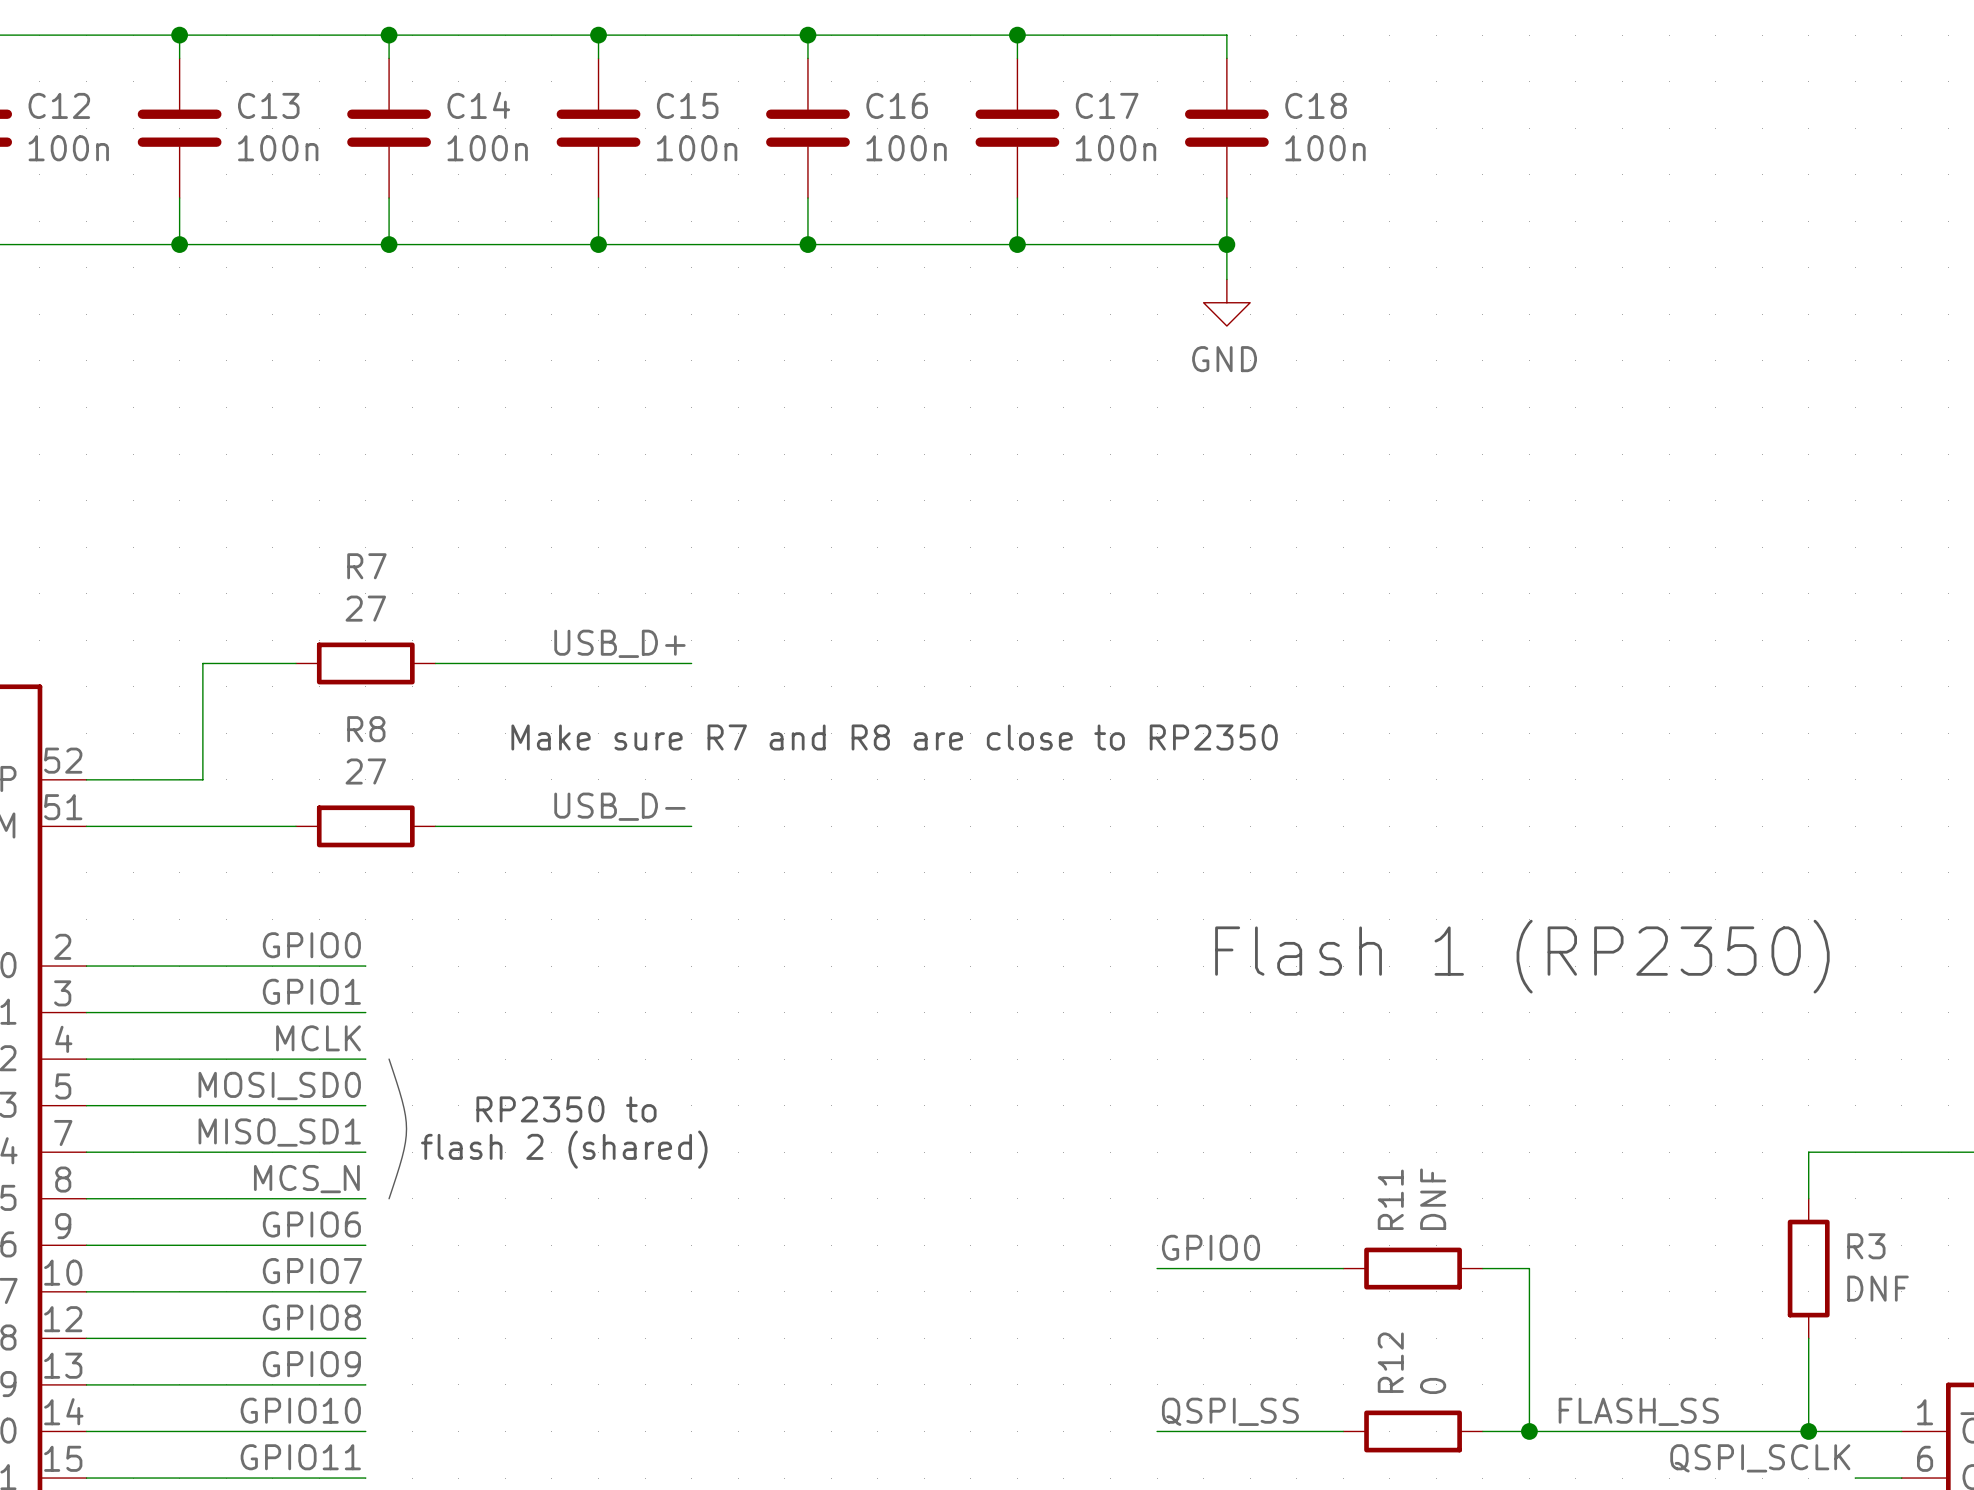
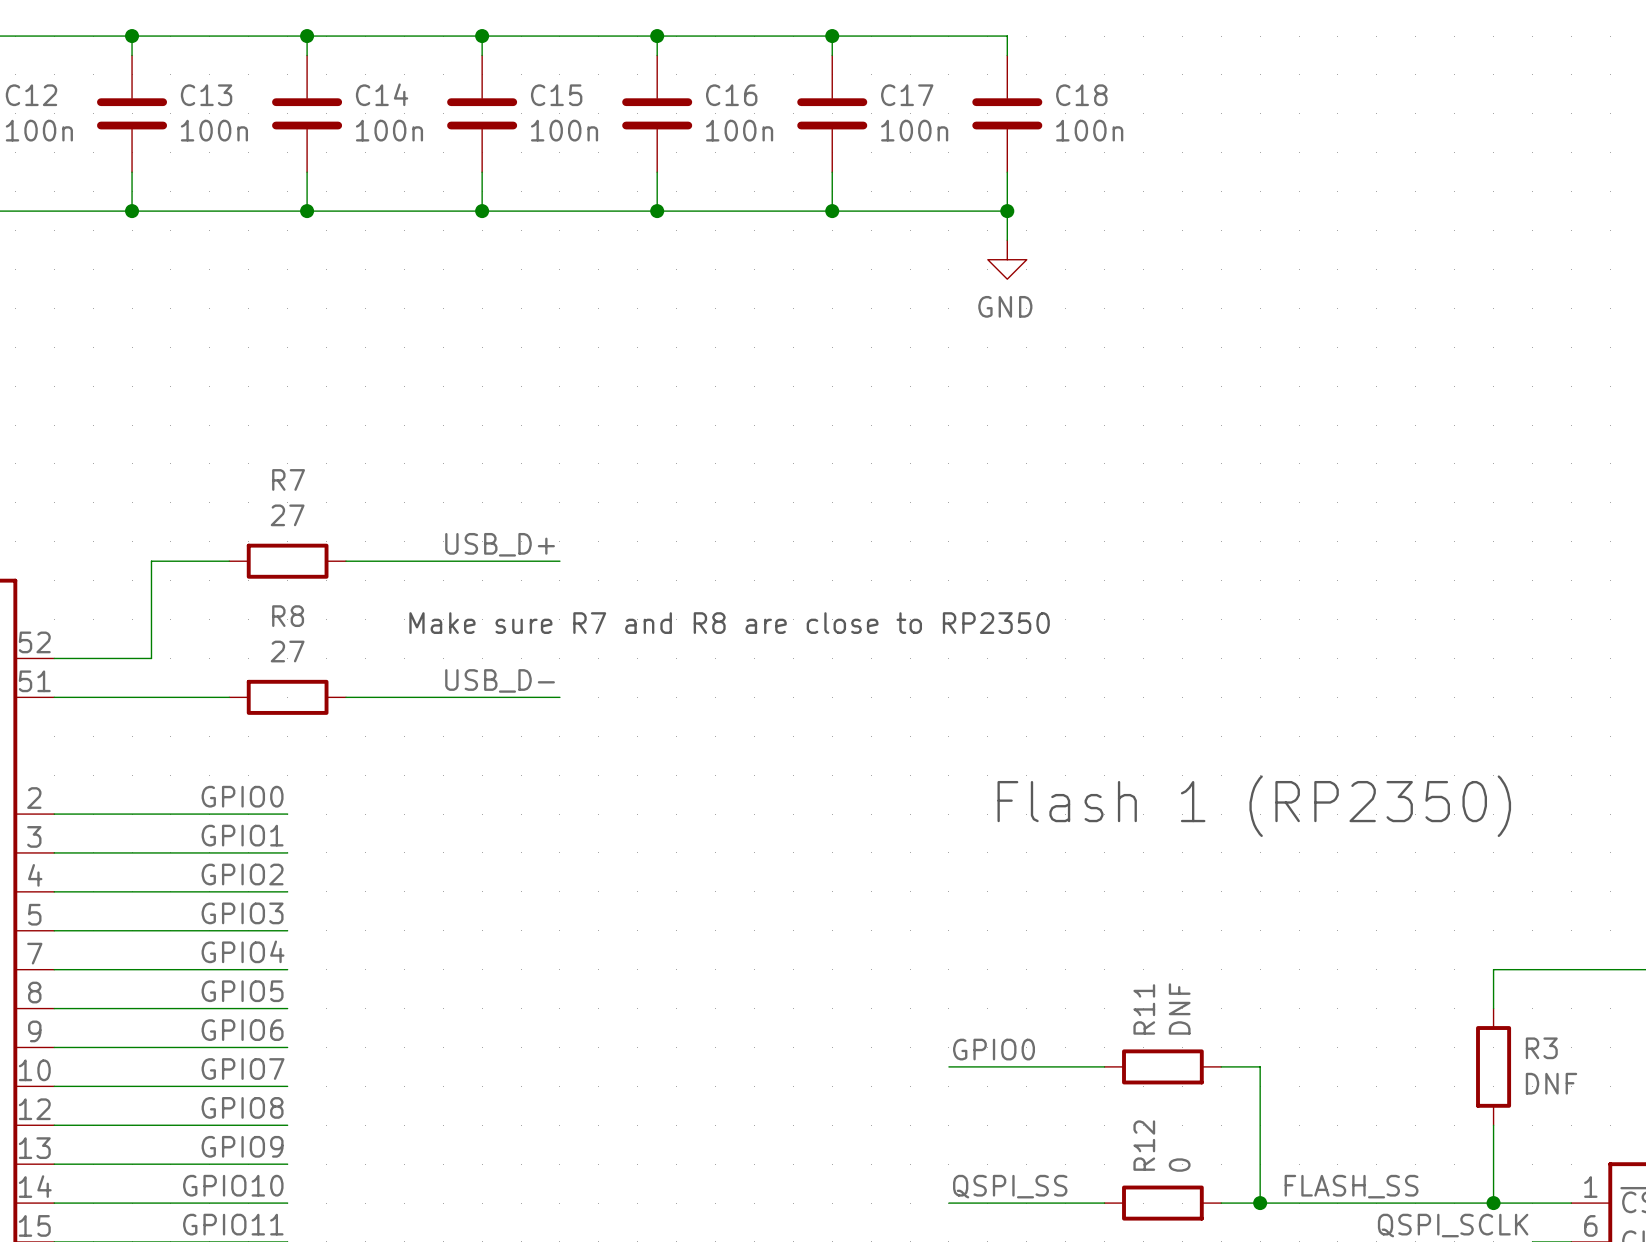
label: MCLK (318, 1038) -> GPIO2 (242, 874)
line: (389, 1059) (402, 1100) (406, 1128) (402, 1157) (389, 1198) -> none
label: MOSI_SD0 (279, 1085) -> GPIO3 (242, 913)
text: RP2350 to (566, 1109) -> none
label: MISO_SD1 (279, 1132) -> GPIO4 (243, 951)
text: flash 2 (shared) (564, 1149) -> none
label: MCS_N (306, 1179) -> GPIO5 (242, 991)

